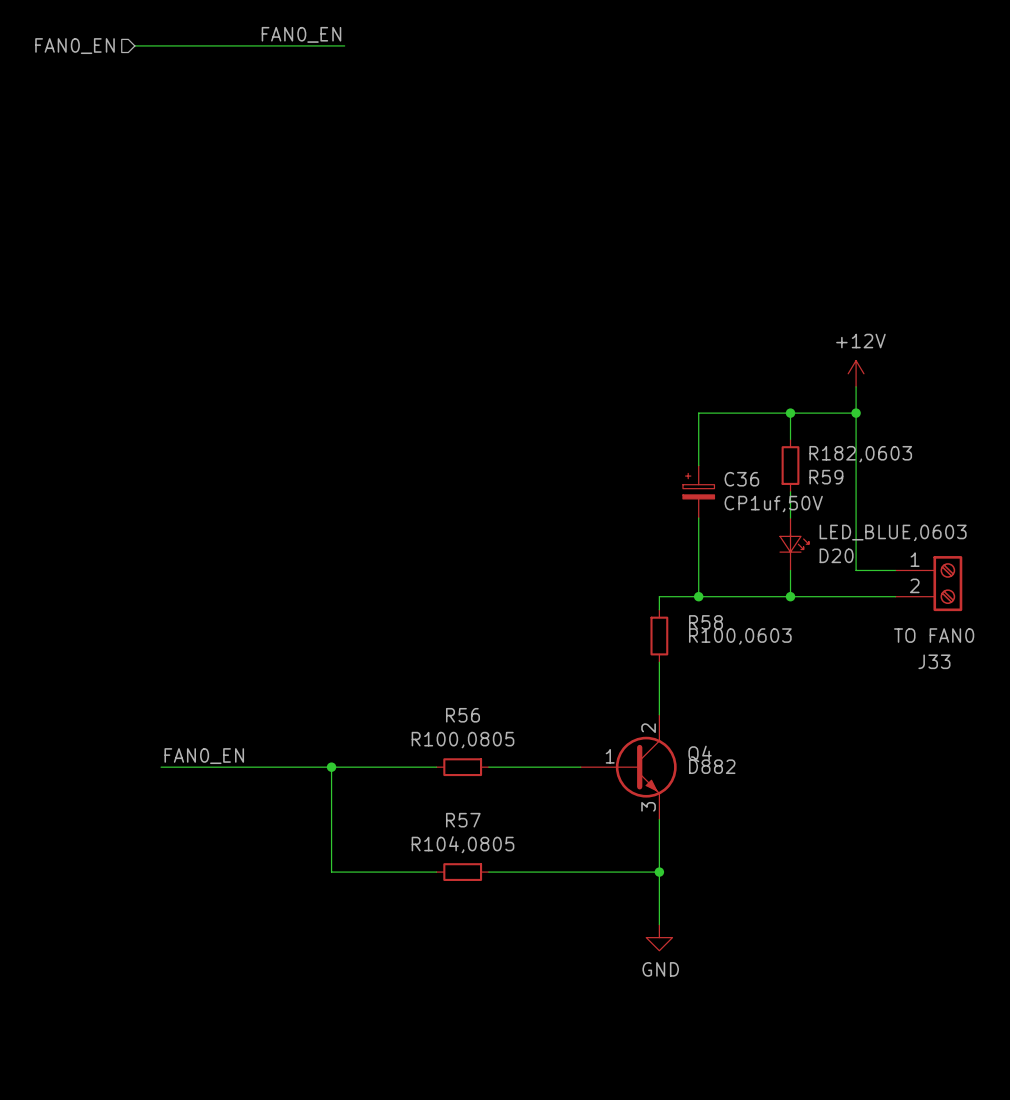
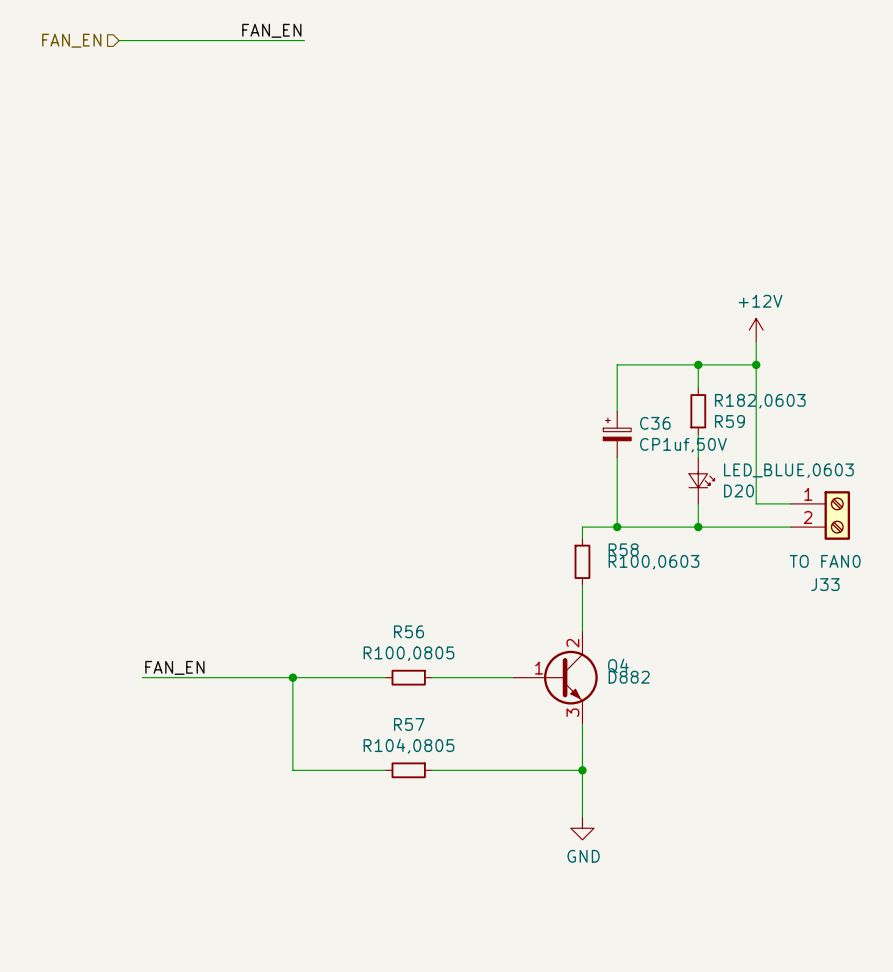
label: FAN0_EN (301, 34) -> FAN_EN (271, 30)
hierarchical label: FAN0_EN (75, 46) -> FAN_EN (71, 40)
label: FAN0_EN (204, 756) -> FAN_EN (174, 667)

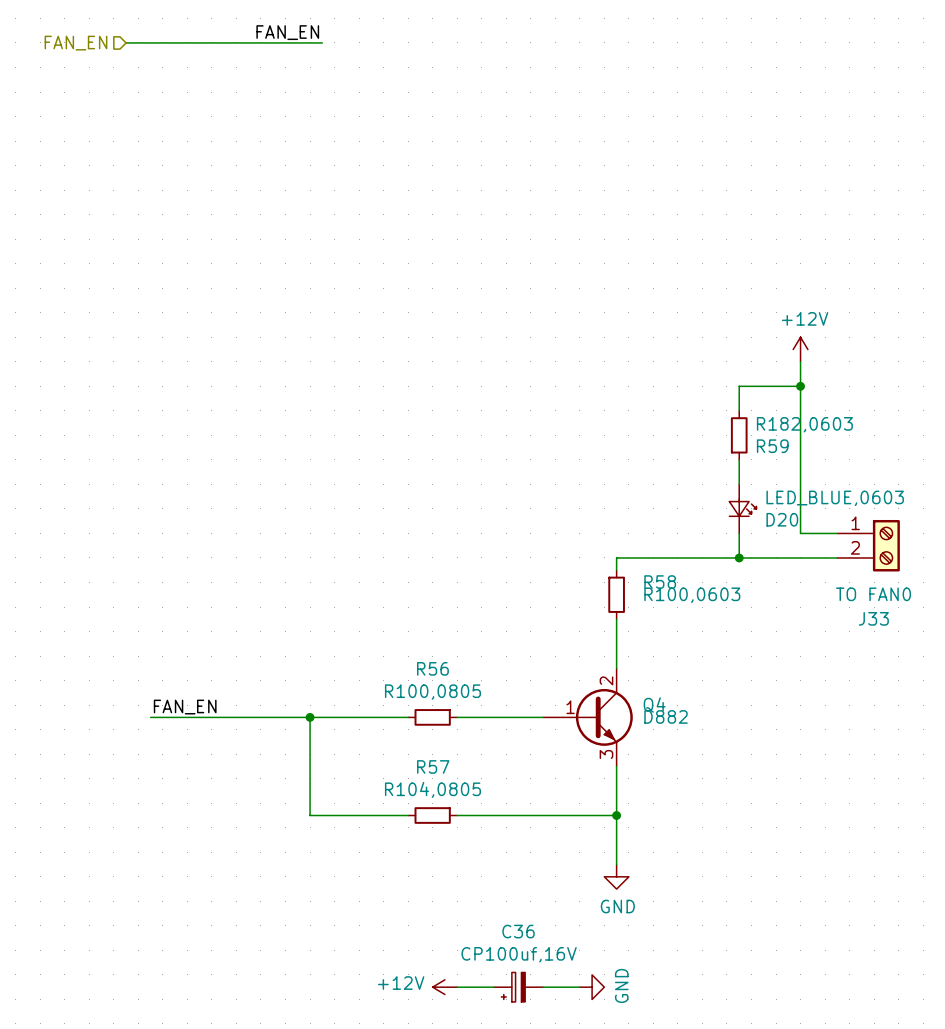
wire: (698, 364) (617, 364) (617, 411) -> none
junction: (698, 364) -> none
C36 rotation: 0° (617, 429) -> 90° counterclockwise (513, 987)
C36 position: (617, 434) -> (518, 987)
C36 value: CP1uf,50V (683, 445) -> CP100uf,16V (519, 954)
wire: (617, 457) (617, 527) -> none
junction: (617, 527) -> none
power symbol: none -> +12V (444, 987)
wire: none -> (457, 987) (493, 987)
wire: none -> (543, 987) (579, 987)
power symbol: none -> GND (592, 987)

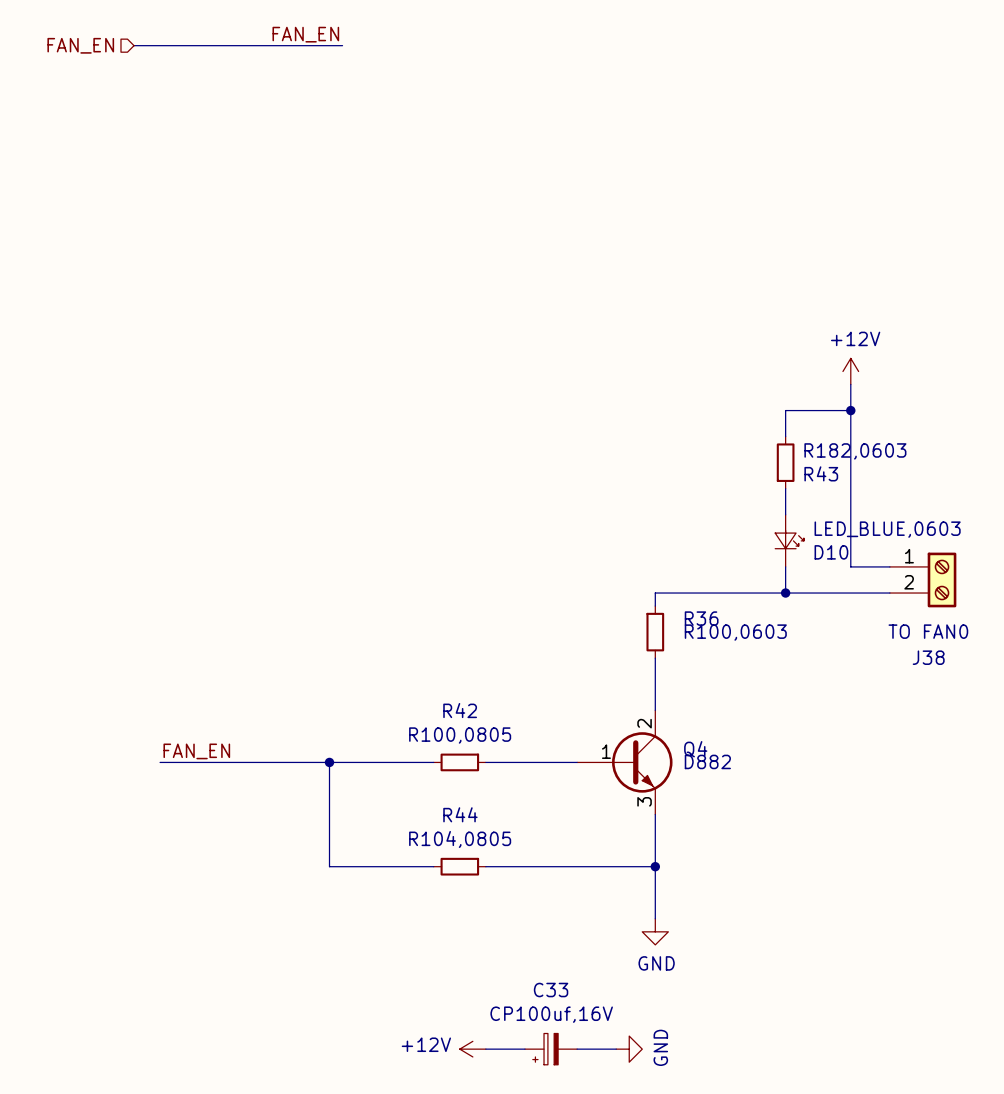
R59 name: R59 (772, 446) -> R43 (821, 473)
D20 name: D20 (782, 519) -> D10 (831, 552)
R58 name: R58 (660, 582) -> R36 (701, 618)
J33 name: J33 (873, 618) -> J38 (928, 657)
R56 name: R56 (432, 668) -> R42 (460, 710)
R57 name: R57 (433, 766) -> R44 (460, 814)
C36 name: C36 (518, 931) -> C33 (551, 990)

